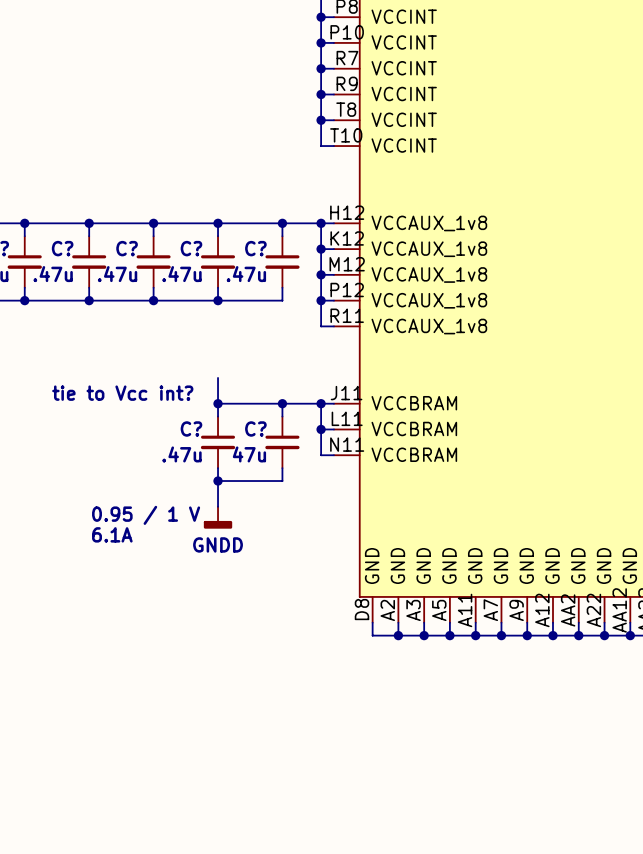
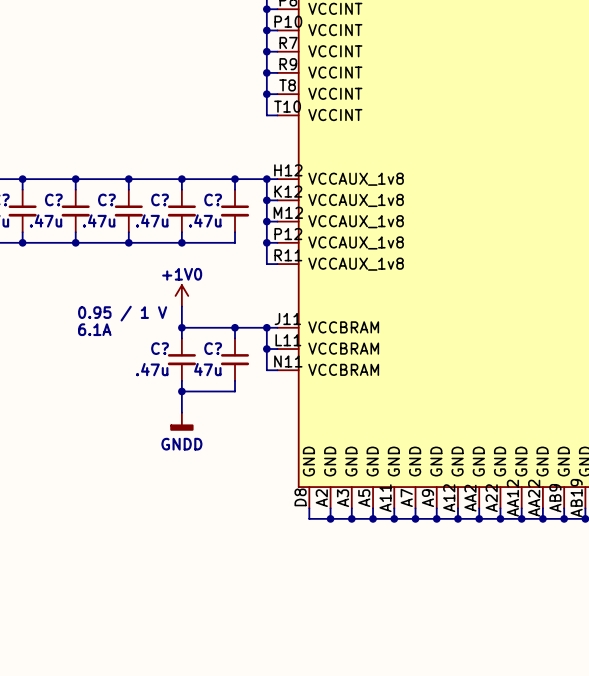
power symbol: none -> +1V0 (181, 295)
text: tie to Vcc int? (122, 393) -> none
text position: 0.95 / 1 V (146, 515) -> 0.95 / 1 V (122, 313)
text position: 6.1A (112, 534) -> 6.1A (94, 329)

